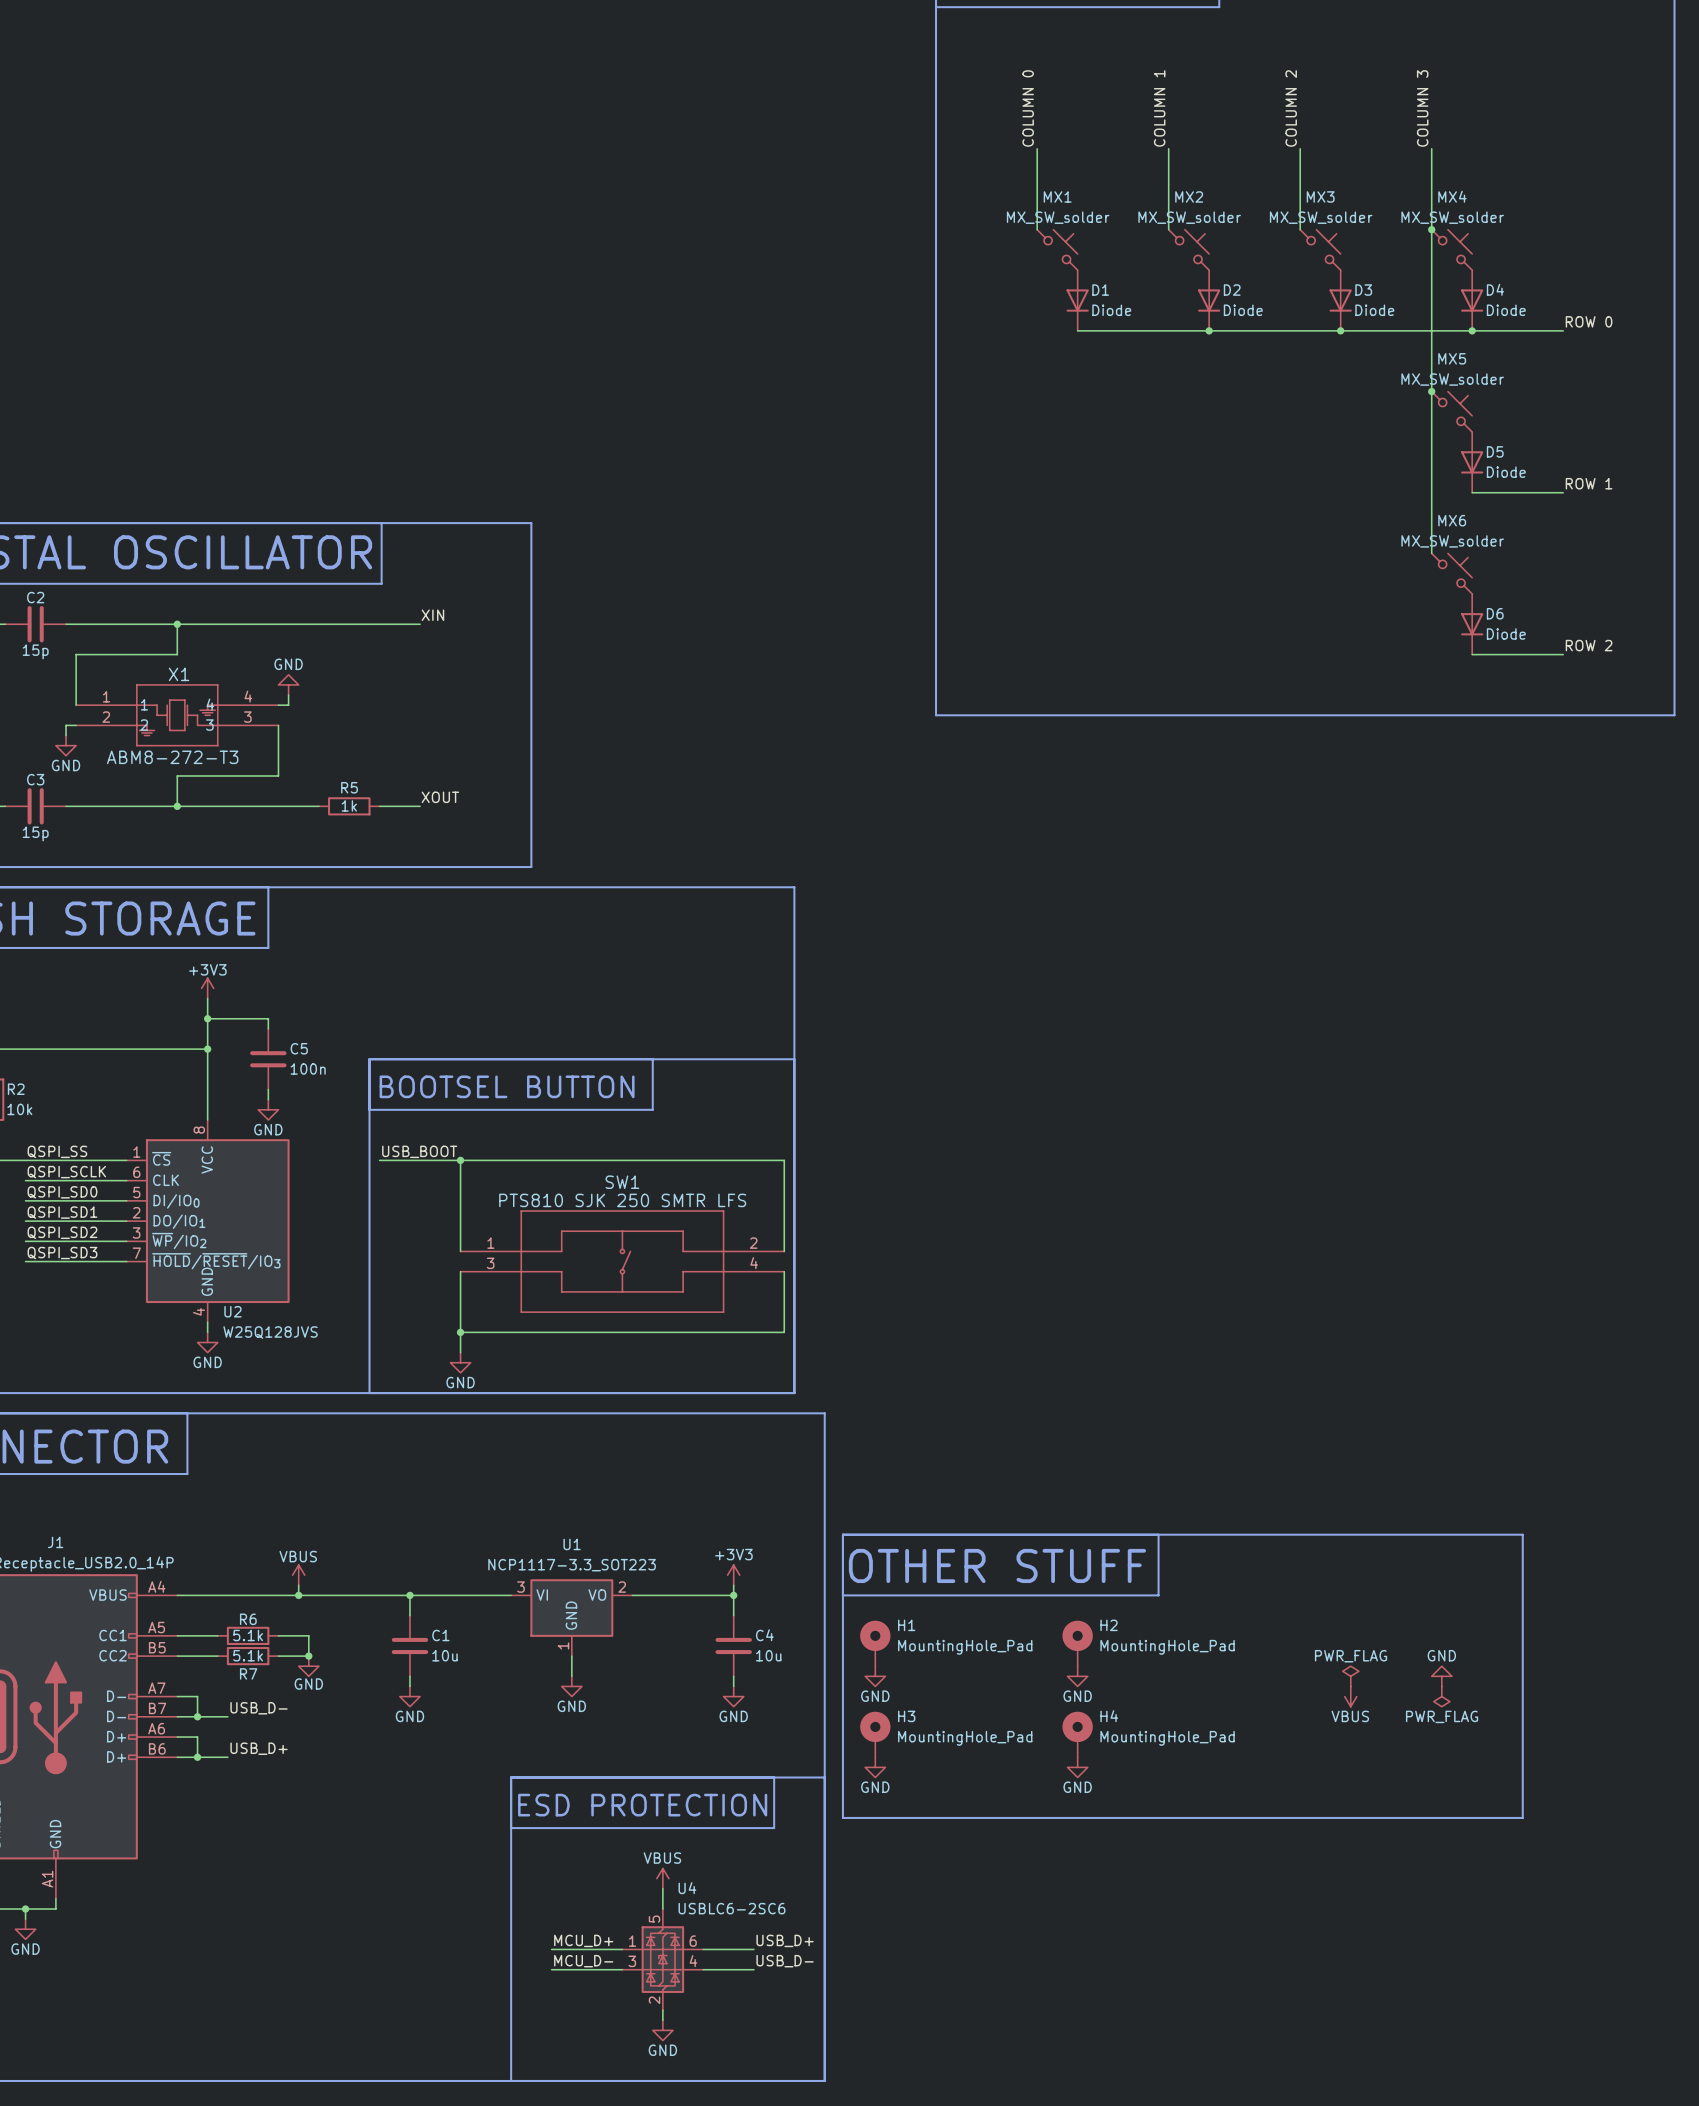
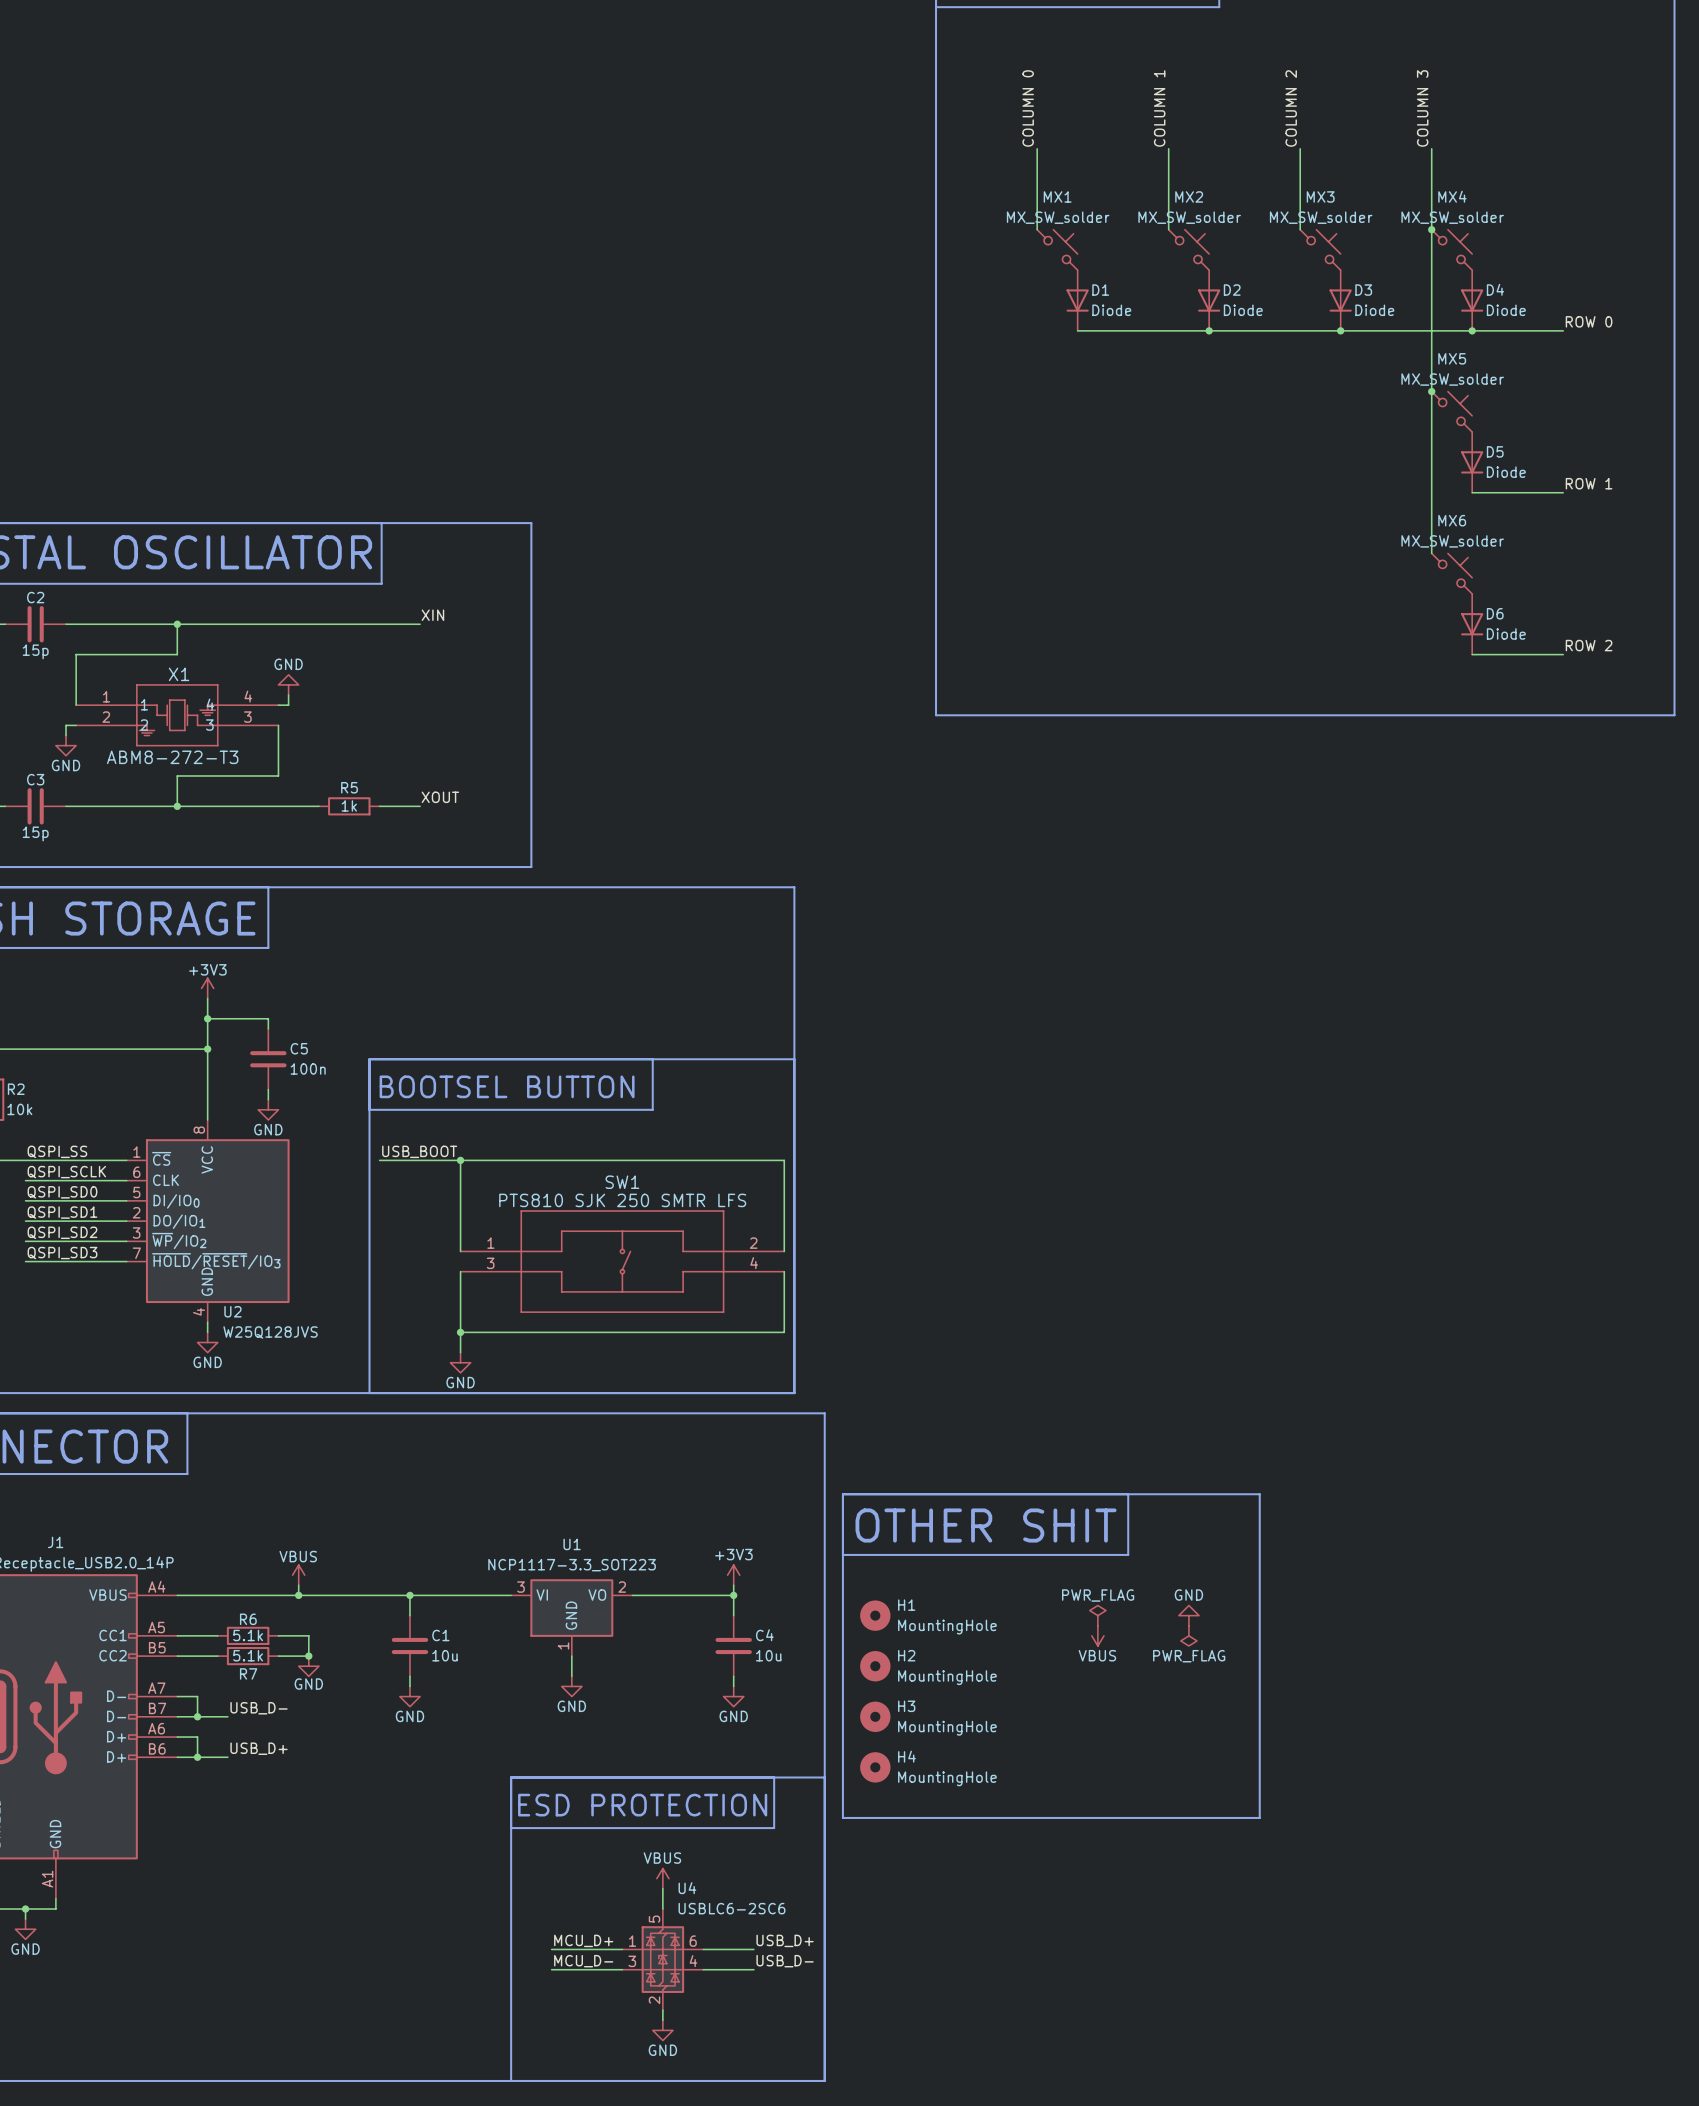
line: none -> (1128, 1494) (1128, 1554) (842, 1554)
line: (842, 1534) (1522, 1534) (1522, 1817) (1259, 1817) -> (842, 1534) (842, 1494) (1259, 1494) (1259, 1817)
line: (1158, 1534) (1158, 1595) (842, 1595) -> none
text: OTHER STUFF (997, 1565) -> OTHER SHIT (986, 1525)
power symbol: none -> PWR_FLAG (1097, 1615)
power symbol: none -> GND (1188, 1615)
H1 symbol: [860, 1620, 891, 1667] -> [860, 1600, 891, 1631]
H2 symbol: [1062, 1620, 1093, 1667] -> [860, 1651, 891, 1682]
power symbol: none -> VBUS (1097, 1635)
power symbol: none -> PWR_FLAG (1188, 1635)
H1 value: MountingHole_Pad (965, 1647) -> MountingHole (947, 1627)
H2 value: MountingHole_Pad (1167, 1647) -> MountingHole (947, 1677)
power symbol: GND (875, 1676) -> none
power symbol: GND (1077, 1676) -> none
power symbol: PWR_FLAG (1350, 1676) -> none
power symbol: GND (1441, 1676) -> none
power symbol: VBUS (1350, 1696) -> none
power symbol: PWR_FLAG (1441, 1696) -> none
H3 symbol: [860, 1711, 891, 1758] -> [860, 1701, 891, 1732]
H4 symbol: [1062, 1711, 1093, 1758] -> [860, 1752, 891, 1783]
H3 value: MountingHole_Pad (965, 1738) -> MountingHole (947, 1728)
H4 value: MountingHole_Pad (1167, 1738) -> MountingHole (947, 1778)
power symbol: GND (875, 1767) -> none
power symbol: GND (1077, 1767) -> none

